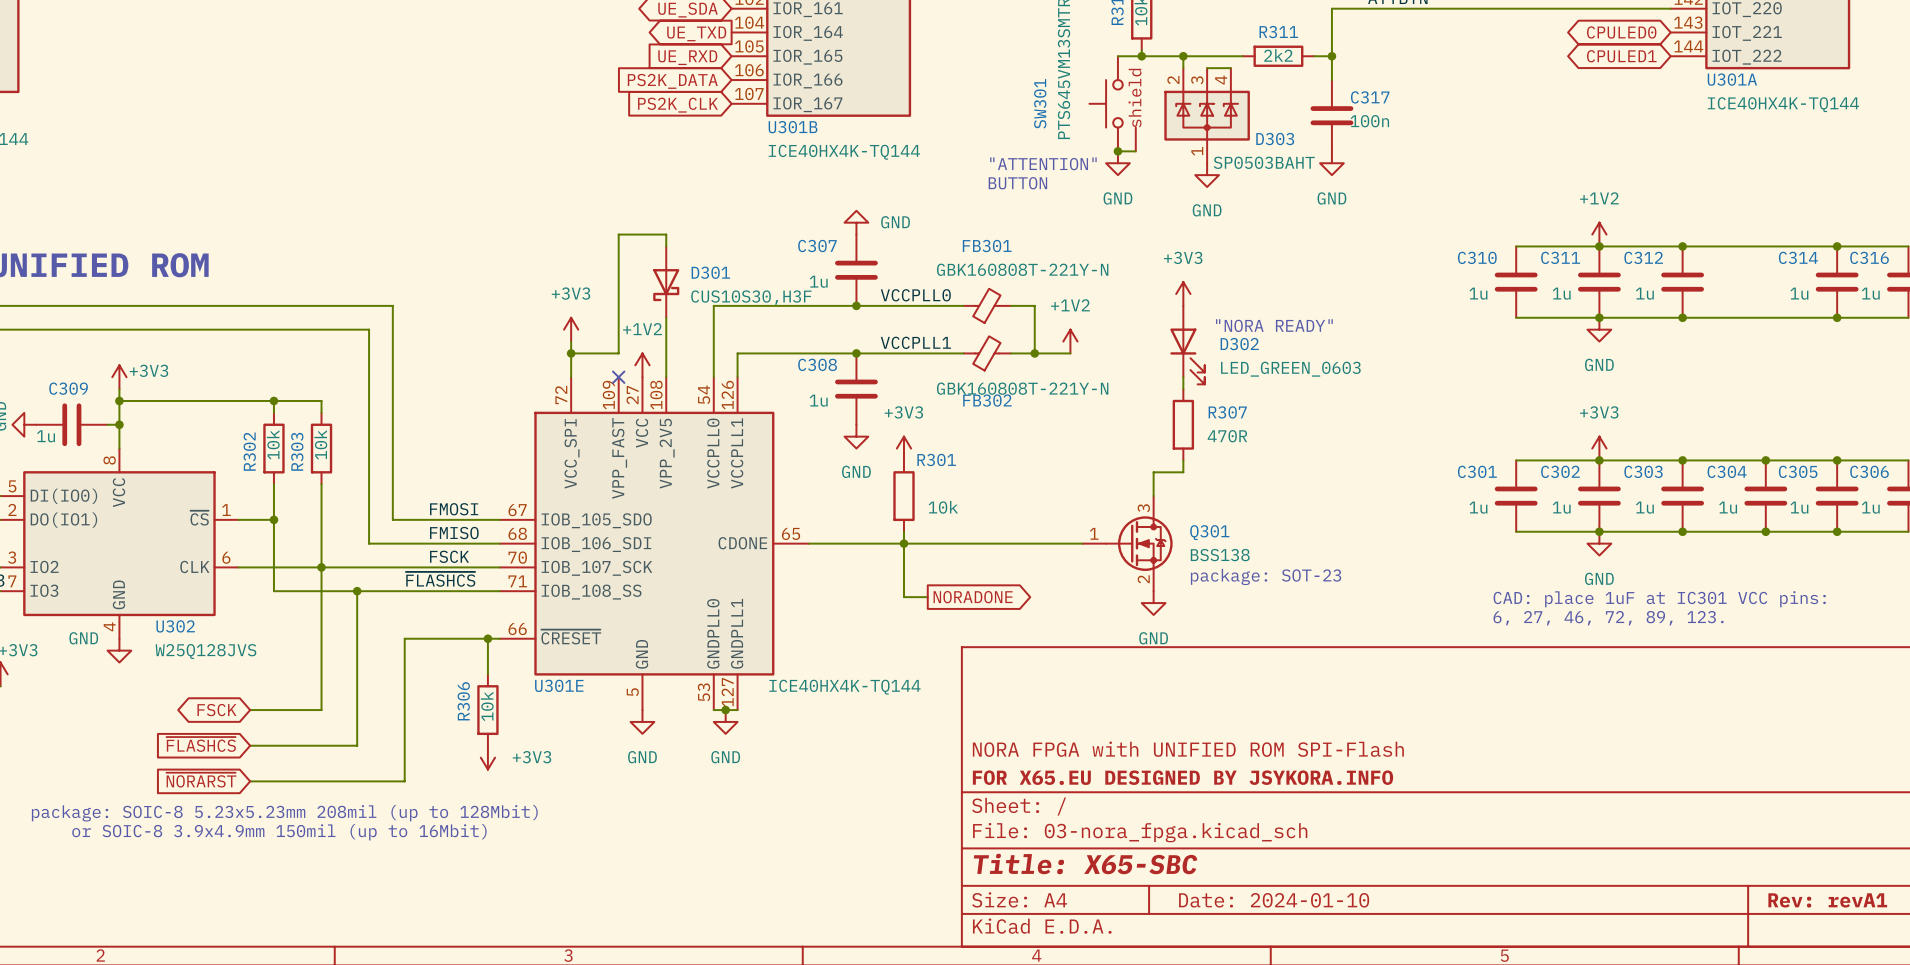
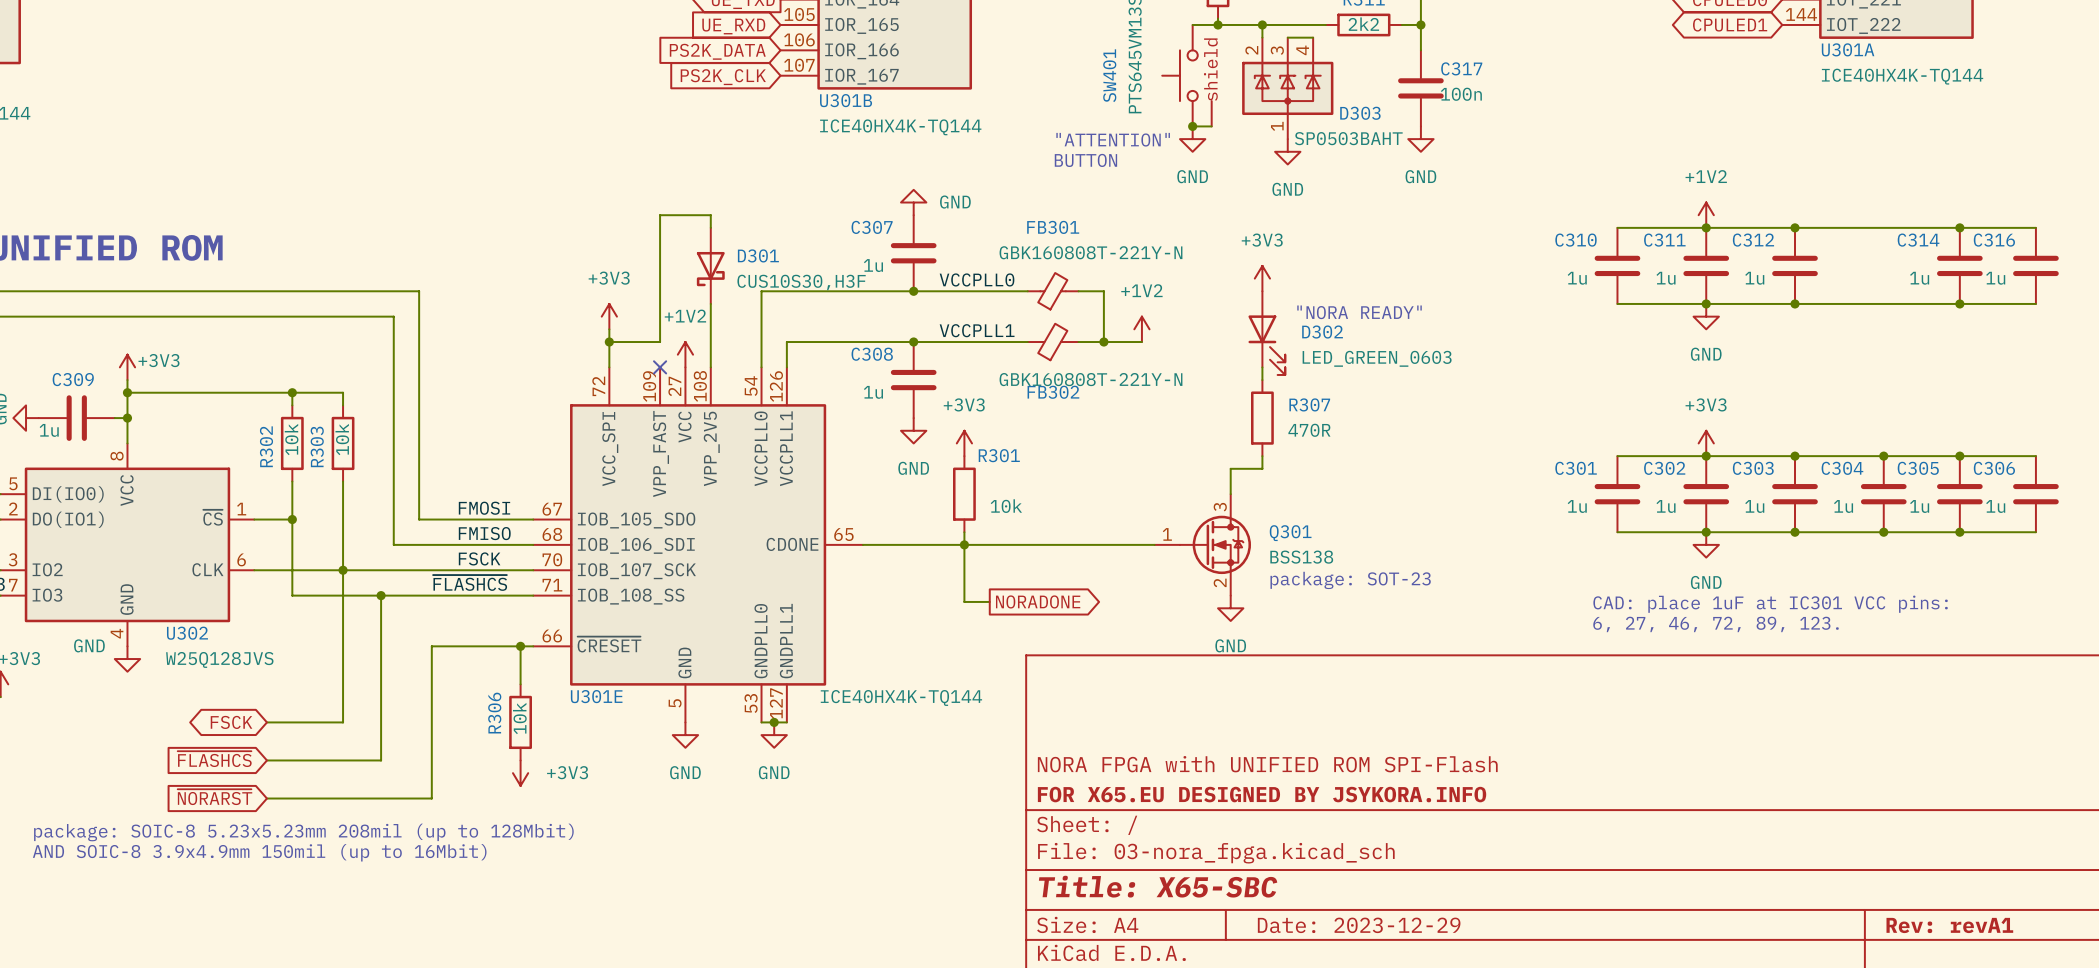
SW301 name: SW301 (1040, 103) -> SW401 (1109, 75)
text: or SOIC-8 3.9x4.9mm 150mil (up to 16Mbit) (279, 832) -> AND SOIC-8 3.9x4.9mm 150mil (up to 16Mbit) (259, 852)
title block: Date: 2024-01-10 (1274, 900) -> Date: 2023-12-29 (1359, 925)

